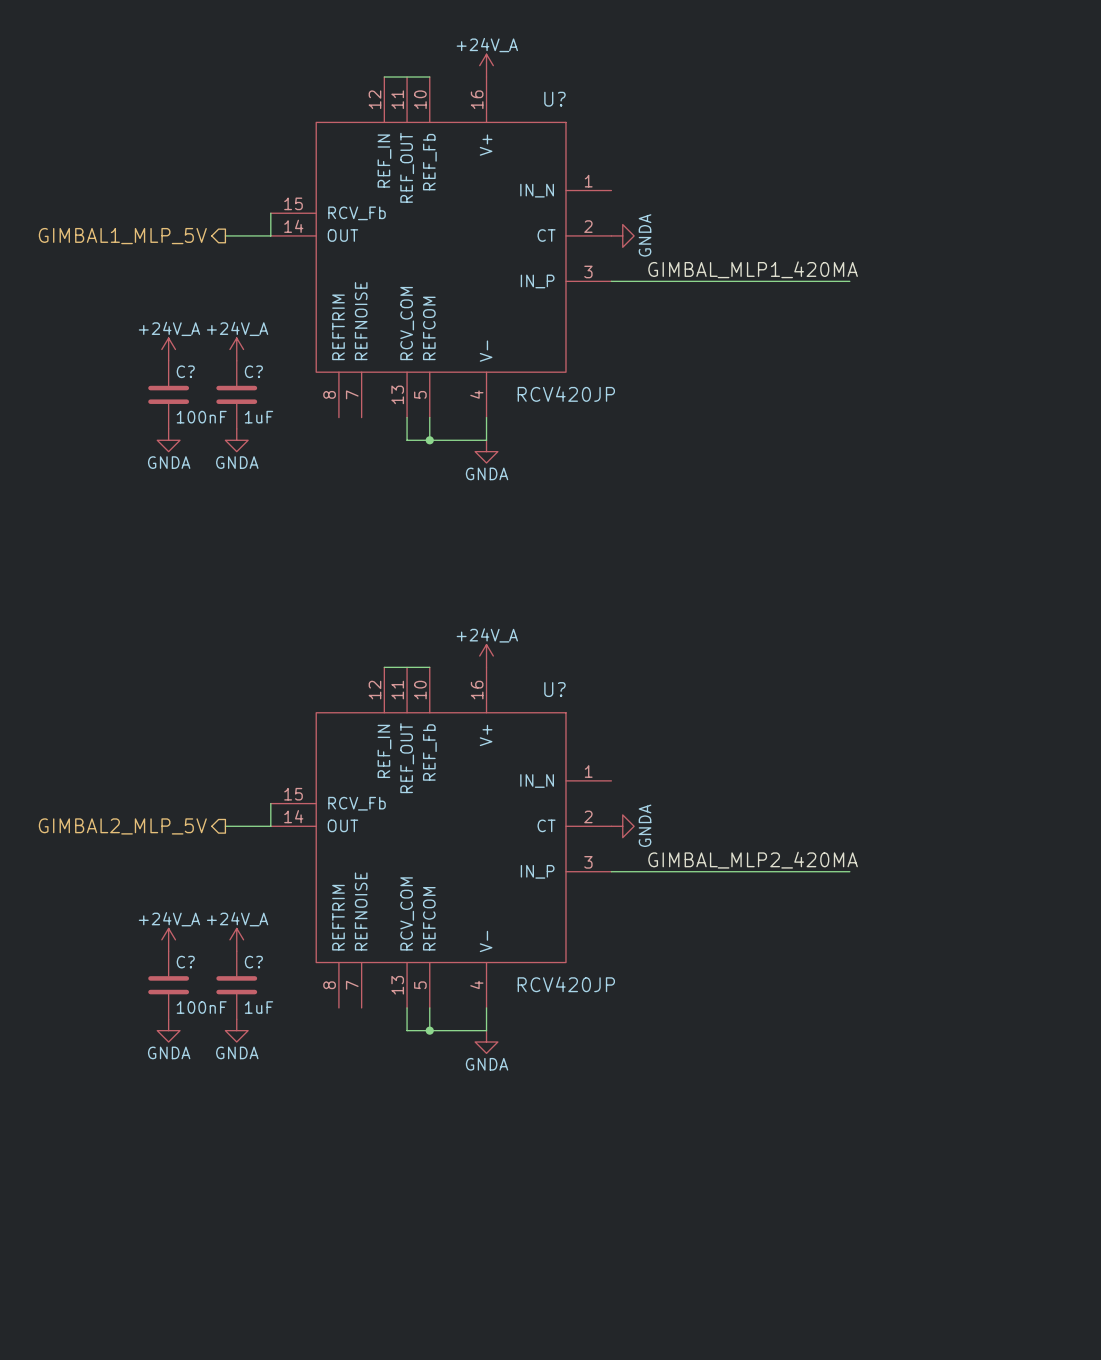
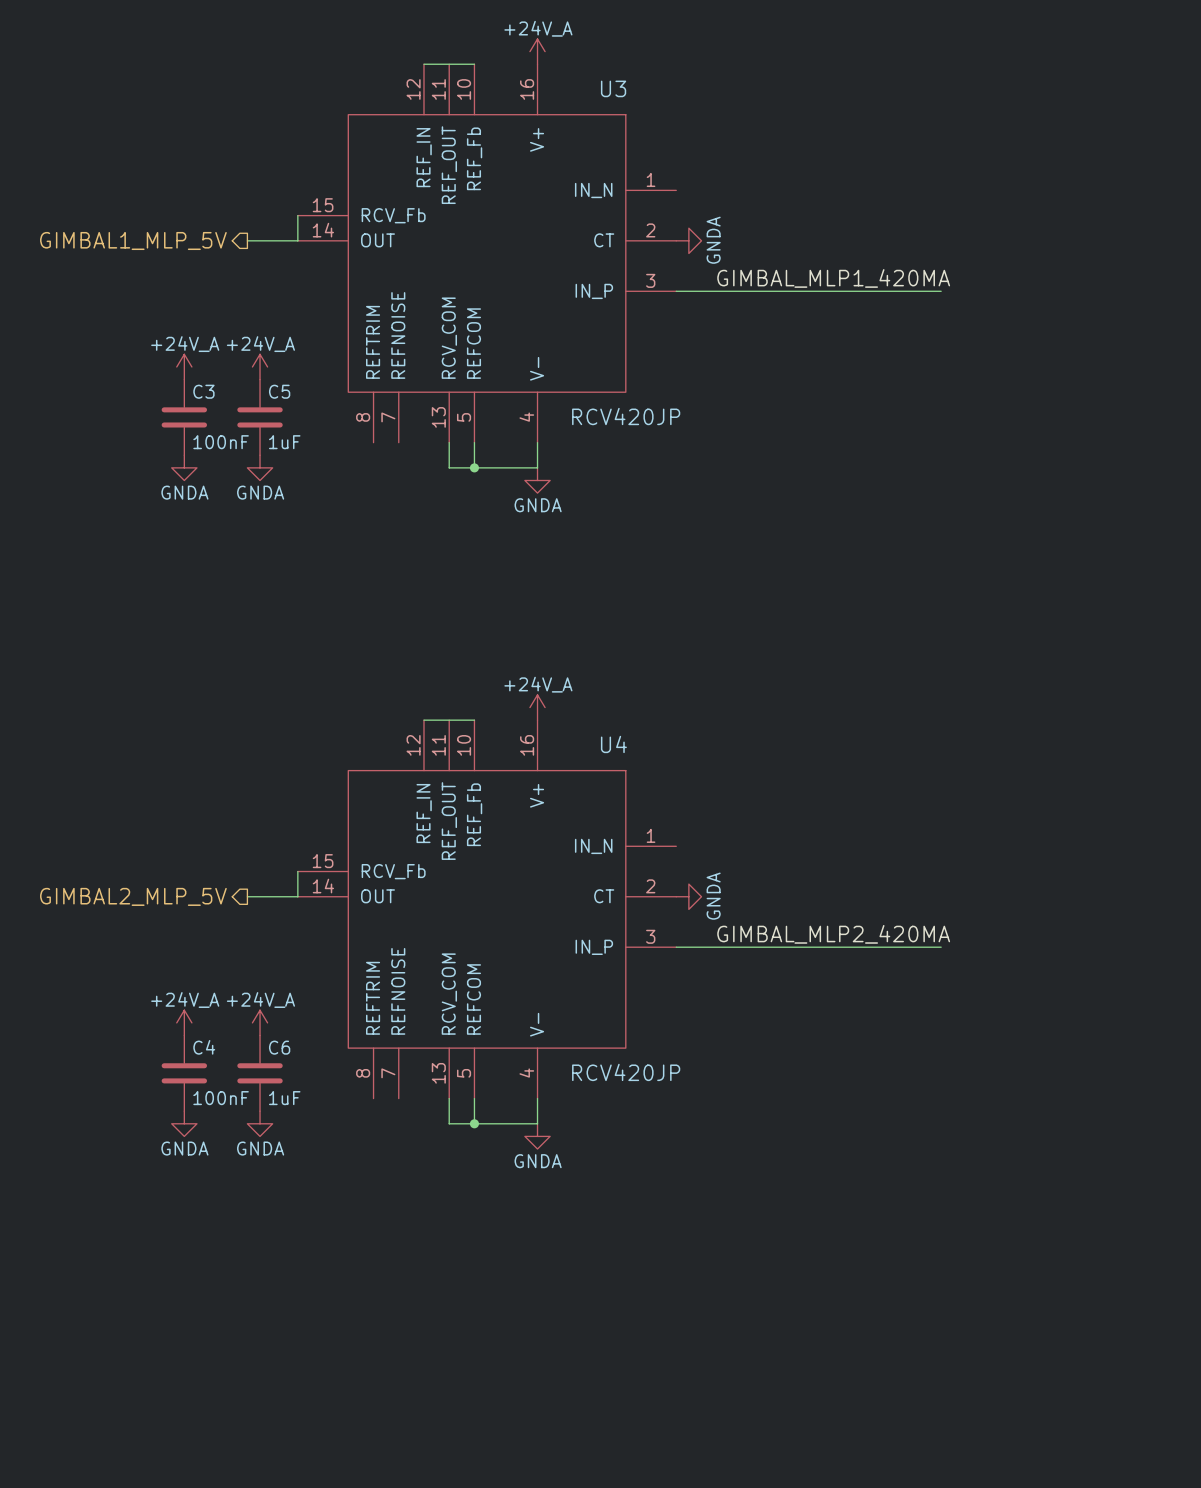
U? name: U? (554, 99) -> U3 (613, 88)
C? name: C? (185, 371) -> C3 (203, 391)
C? name: C? (253, 371) -> C5 (279, 391)
U? name: U? (554, 689) -> U4 (613, 744)
C? name: C? (185, 962) -> C4 (204, 1047)
C? name: C? (253, 962) -> C6 (279, 1047)

